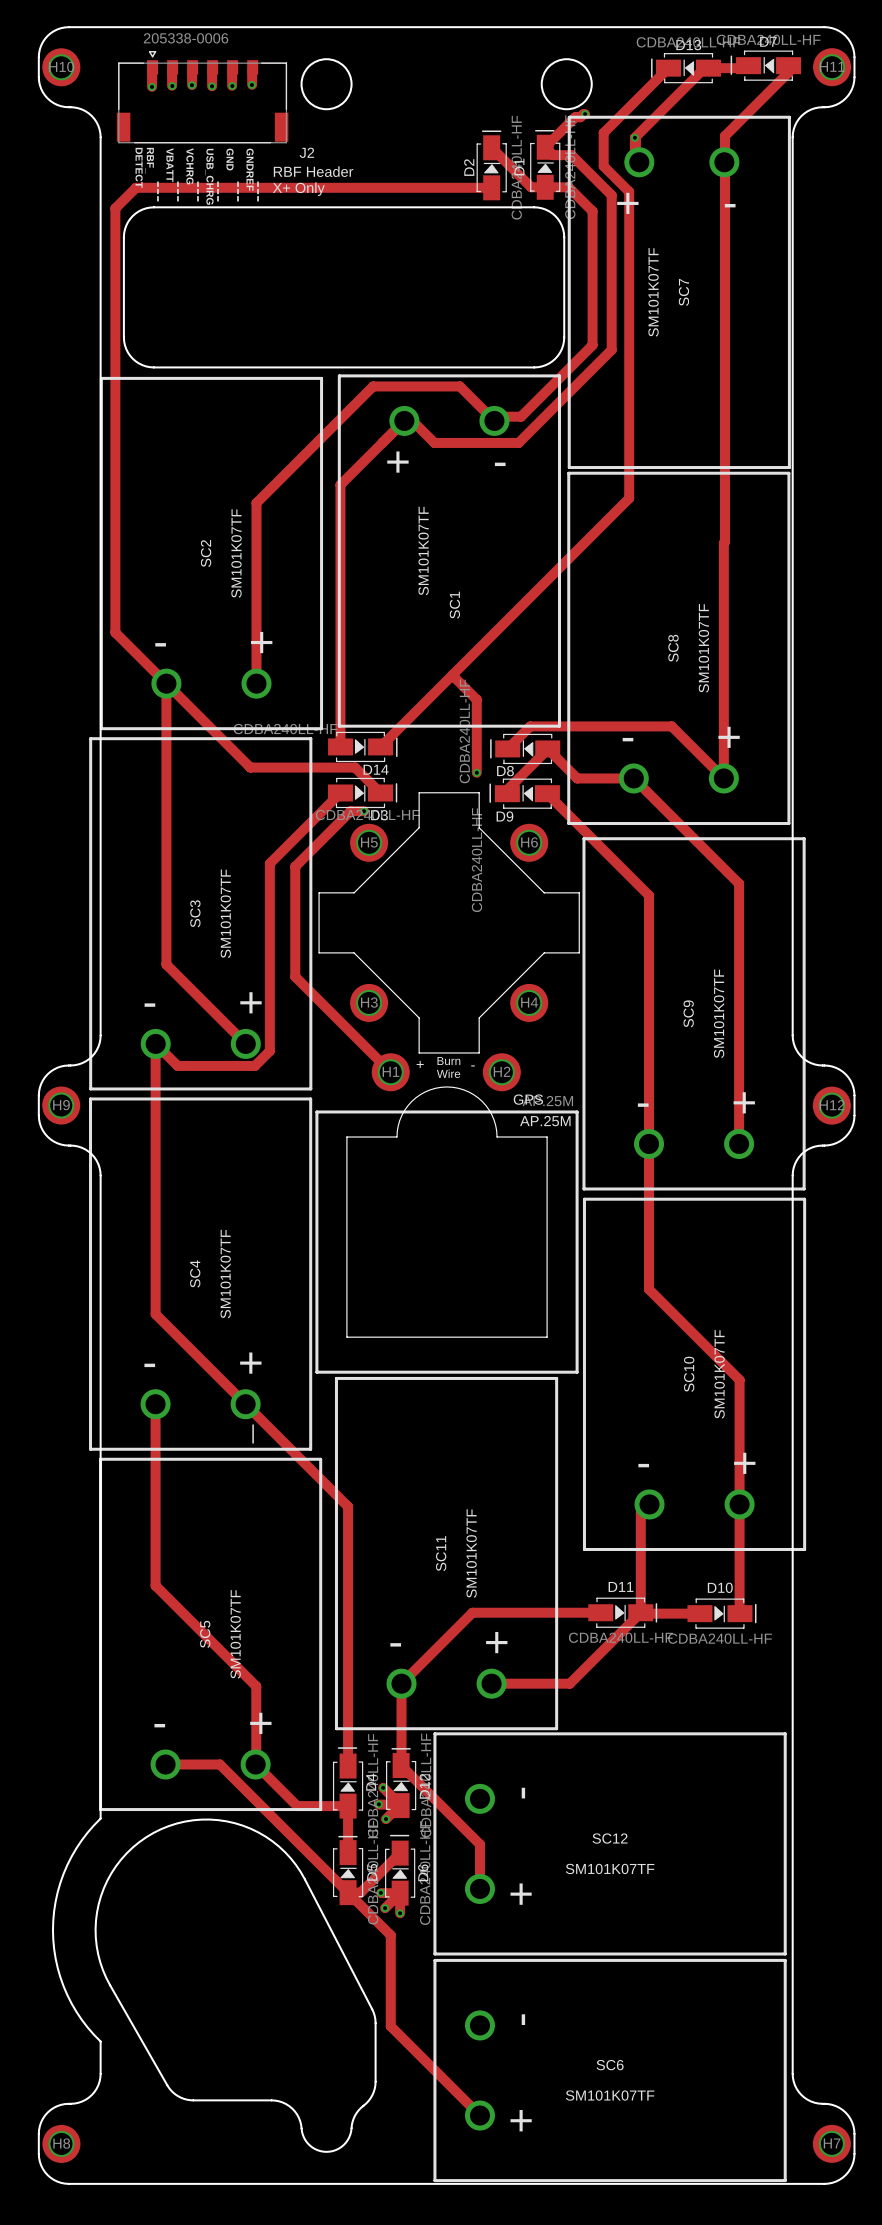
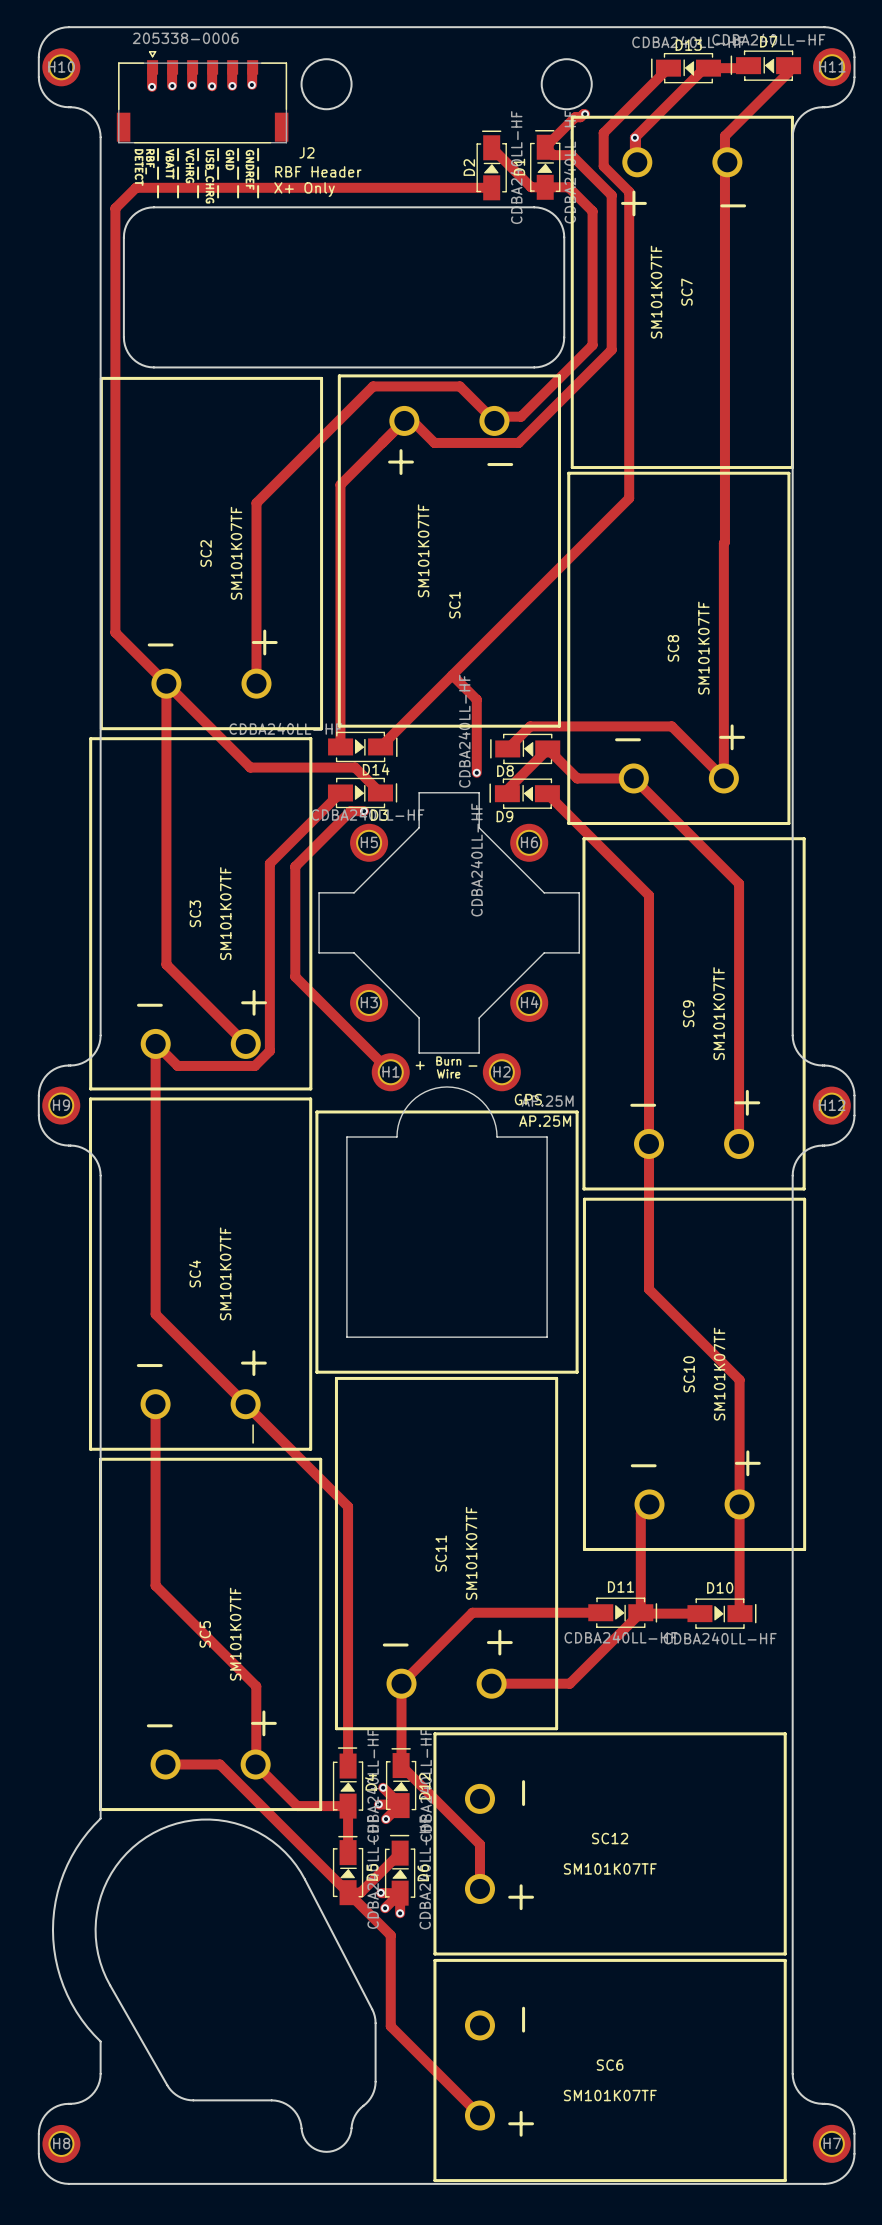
SC7 footprint: [567, 115, 791, 470] -> [570, 115, 794, 470]

